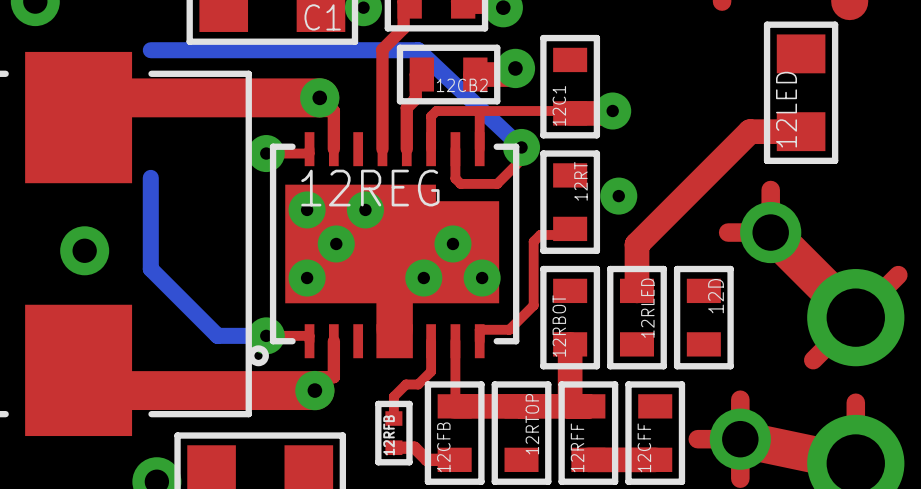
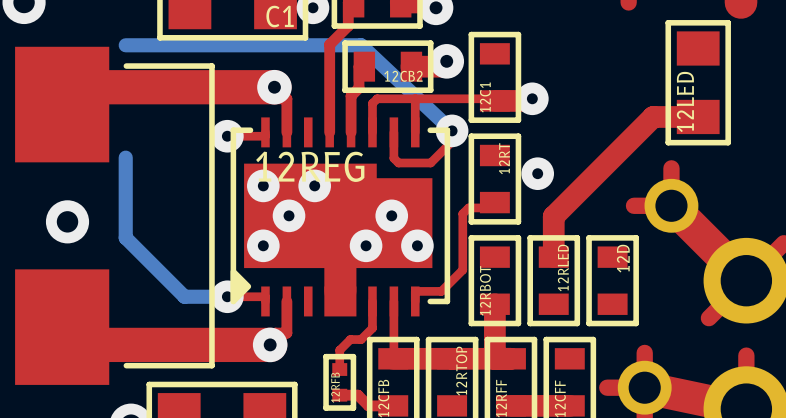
12REG footprint: [248, 132, 520, 367] -> [230, 117, 451, 317]

